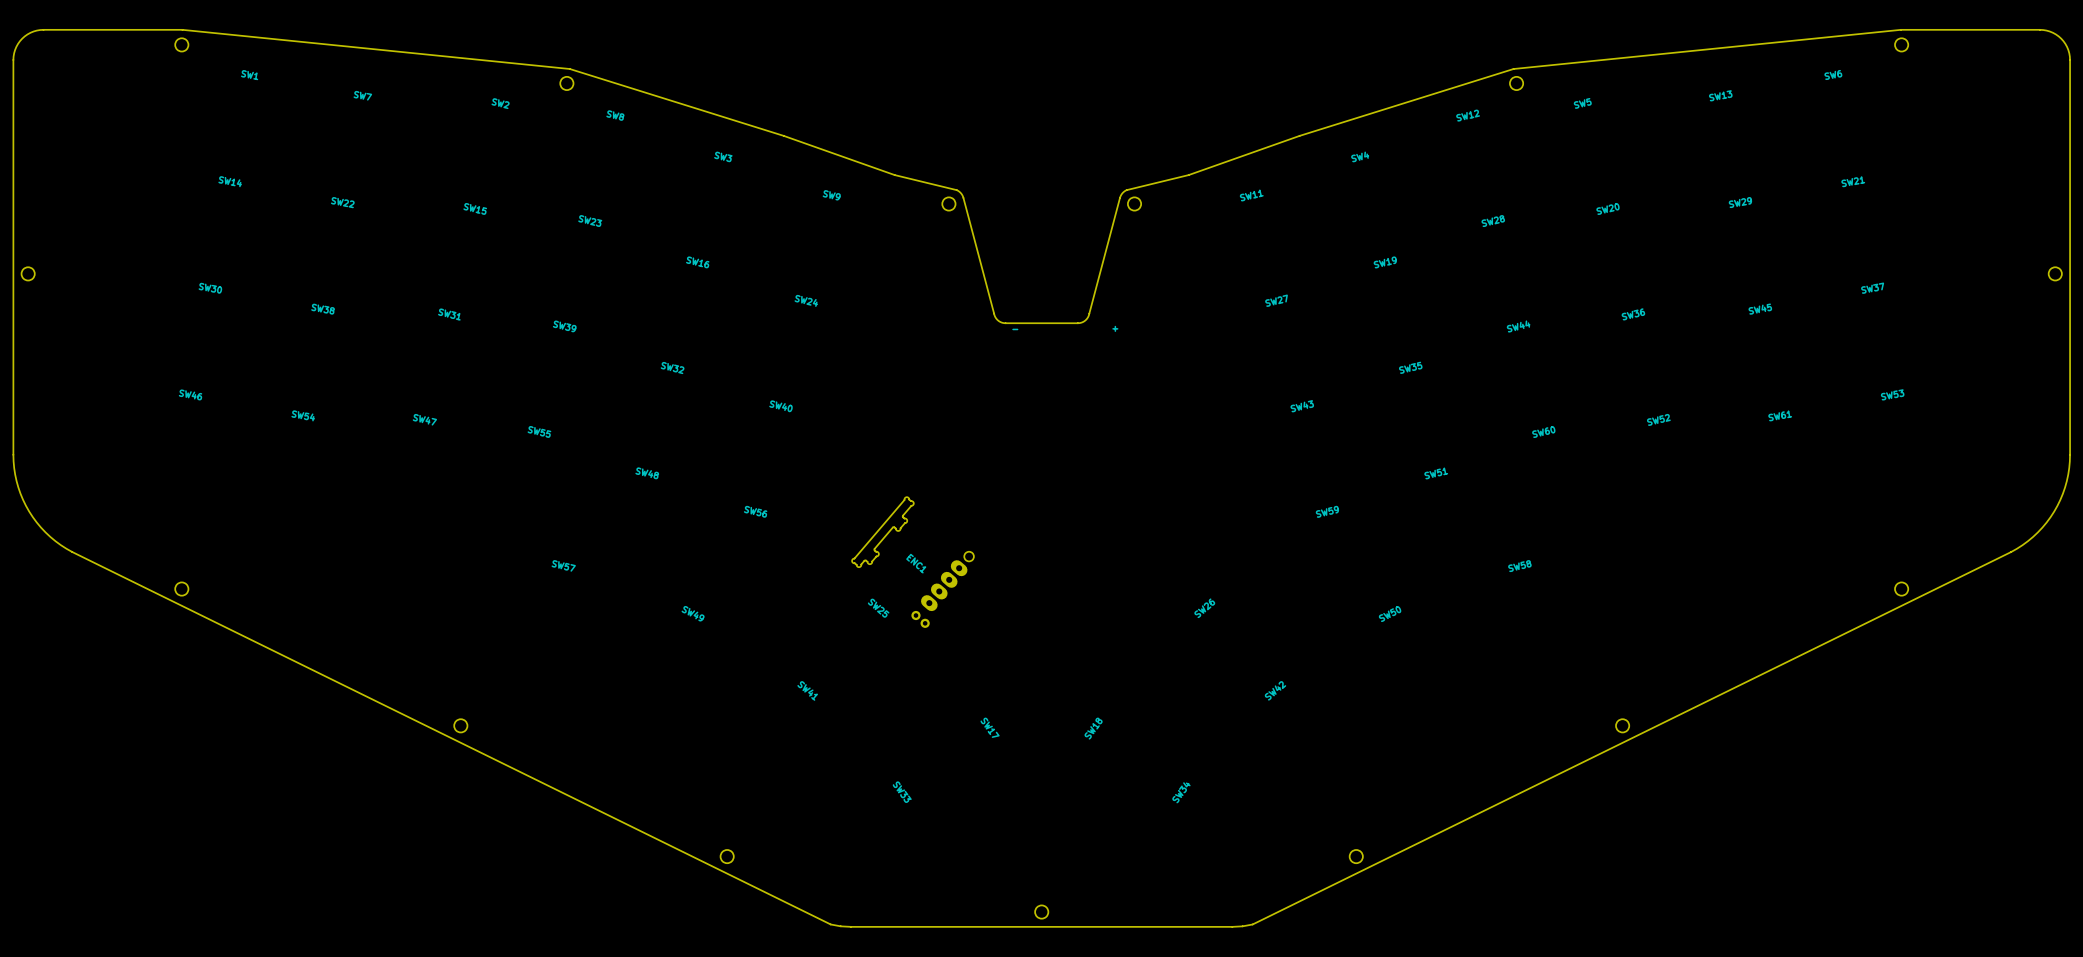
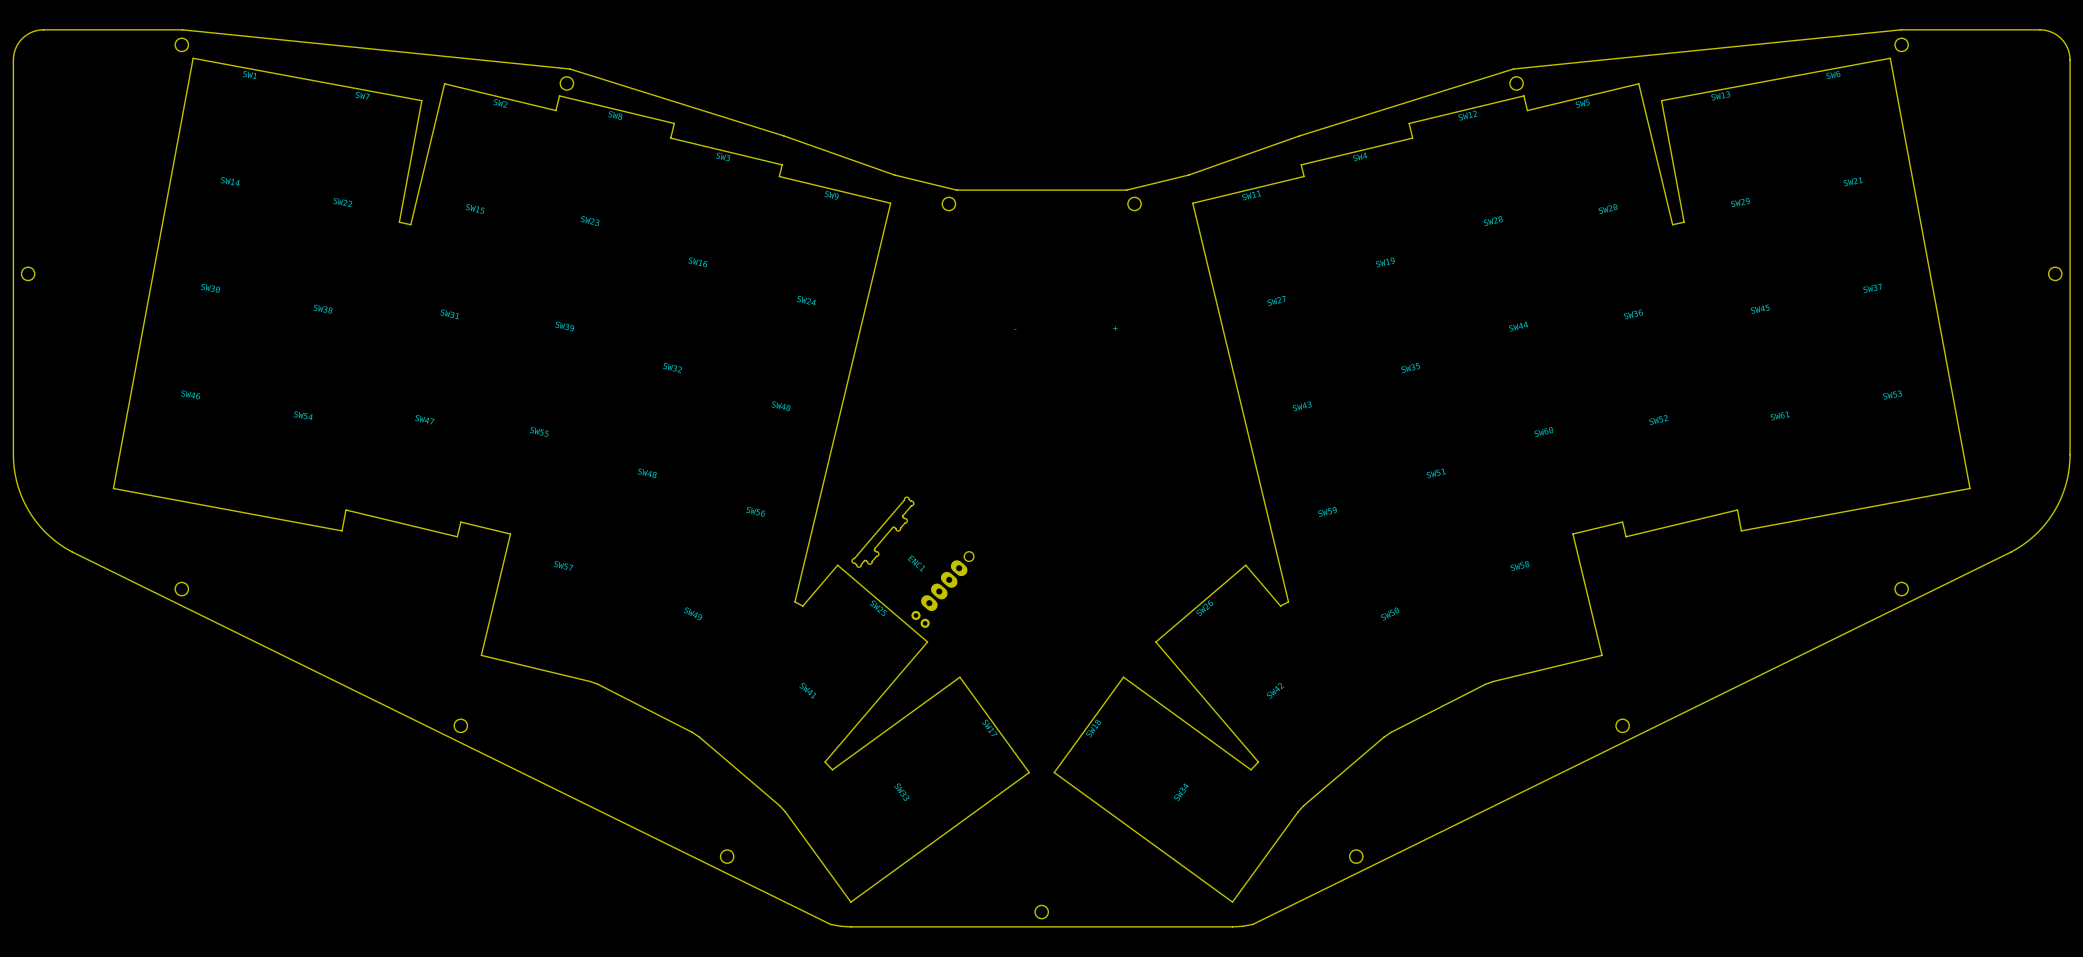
board edge: none -> (193, 58) (113, 488) (342, 530) (346, 510) (457, 536) (460, 522) (510, 534) (481, 655) (597, 684) (692, 732) (779, 805) (850, 902) (1029, 772) (959, 677) (832, 769) (825, 762) (927, 642) (837, 565) (802, 606) (794, 601) (890, 203) (779, 176) (782, 164) (670, 138) (674, 123) (559, 95) (556, 110) (444, 83) (410, 224) (399, 222) (421, 100) (193, 58)
board edge: none -> (1890, 58) (1970, 488) (1741, 530) (1737, 510) (1626, 536) (1622, 522) (1572, 534) (1602, 655) (1485, 684) (1391, 732) (1303, 805) (1232, 902) (1054, 772) (1123, 677) (1251, 769) (1258, 762) (1155, 642) (1245, 565) (1280, 606) (1288, 601) (1192, 203) (1304, 176) (1301, 164) (1412, 138) (1409, 123) (1523, 95) (1527, 110) (1638, 83) (1672, 224) (1684, 222) (1661, 100) (1890, 58)
board edge: (956, 190) (963, 197) (994, 314) (998, 320) (1005, 323) (1077, 323) (1086, 319) (1120, 197) (1126, 190) -> (956, 190) (1126, 190)

